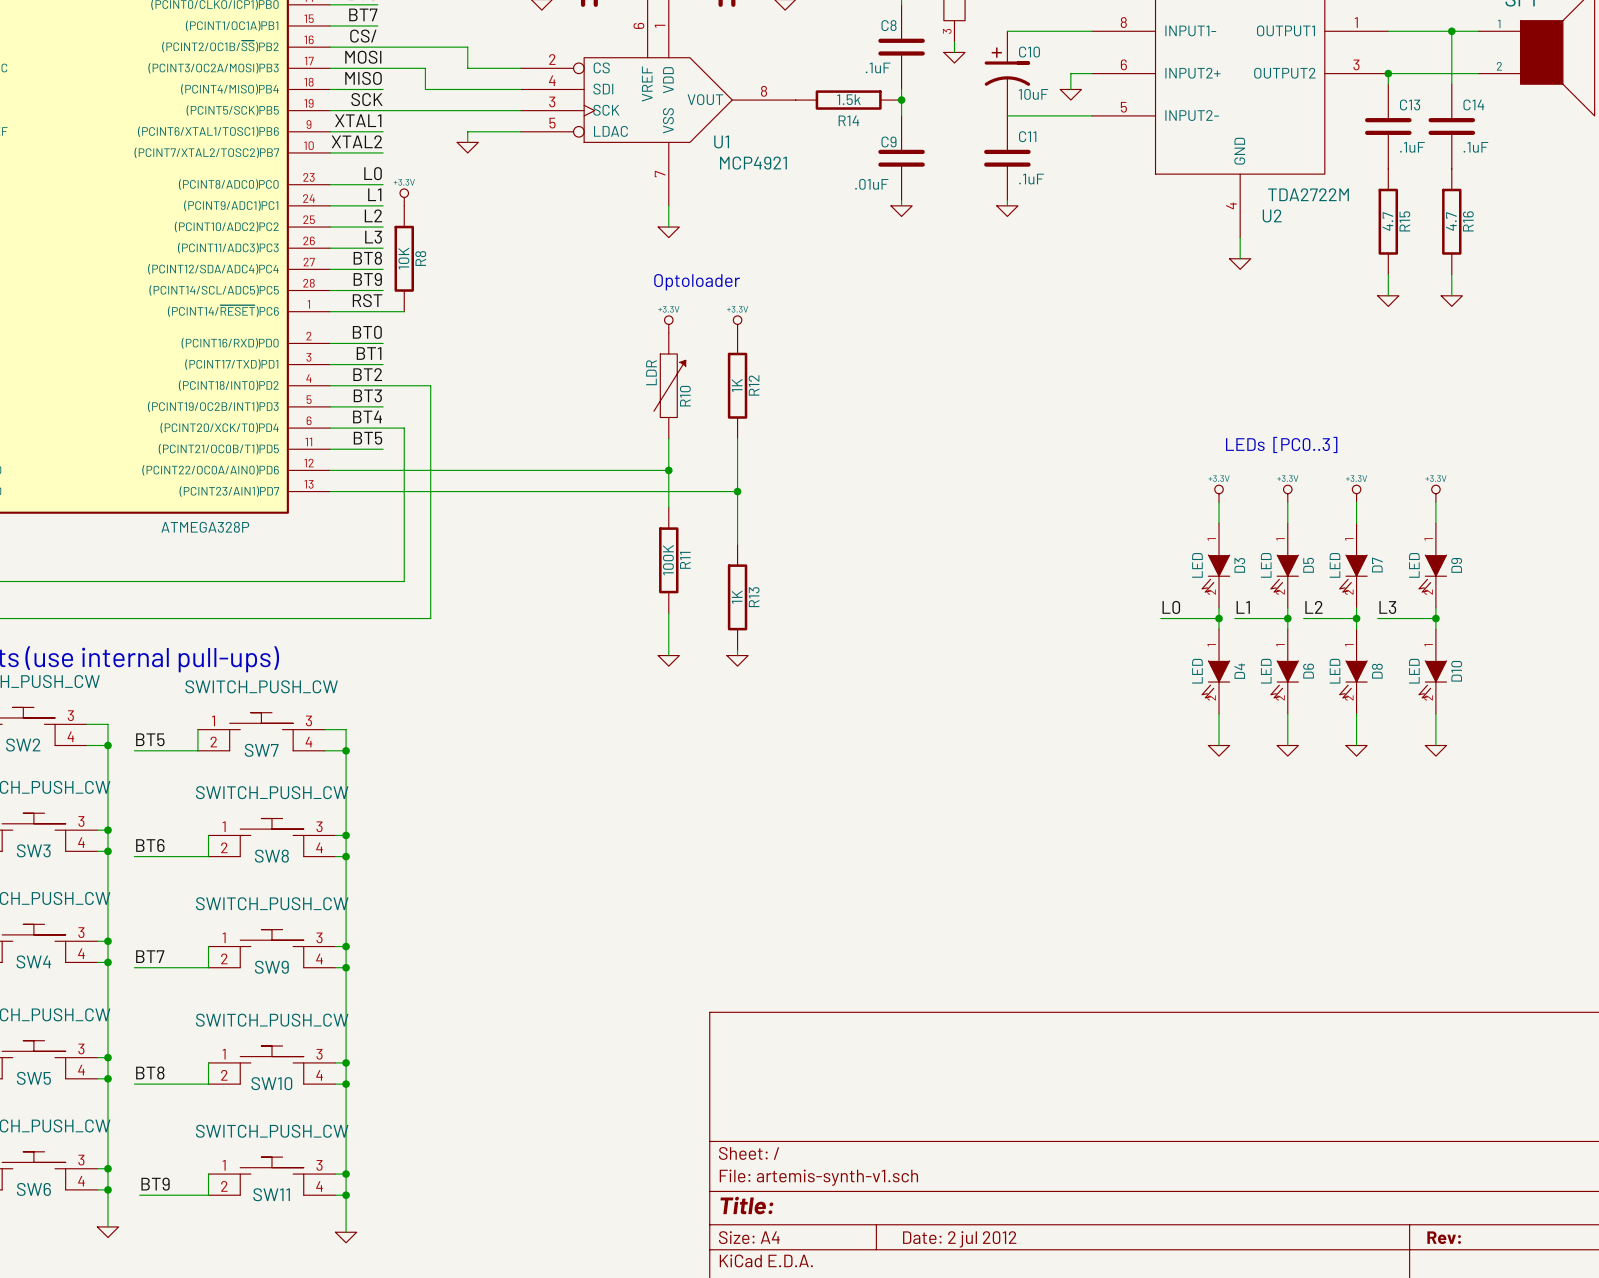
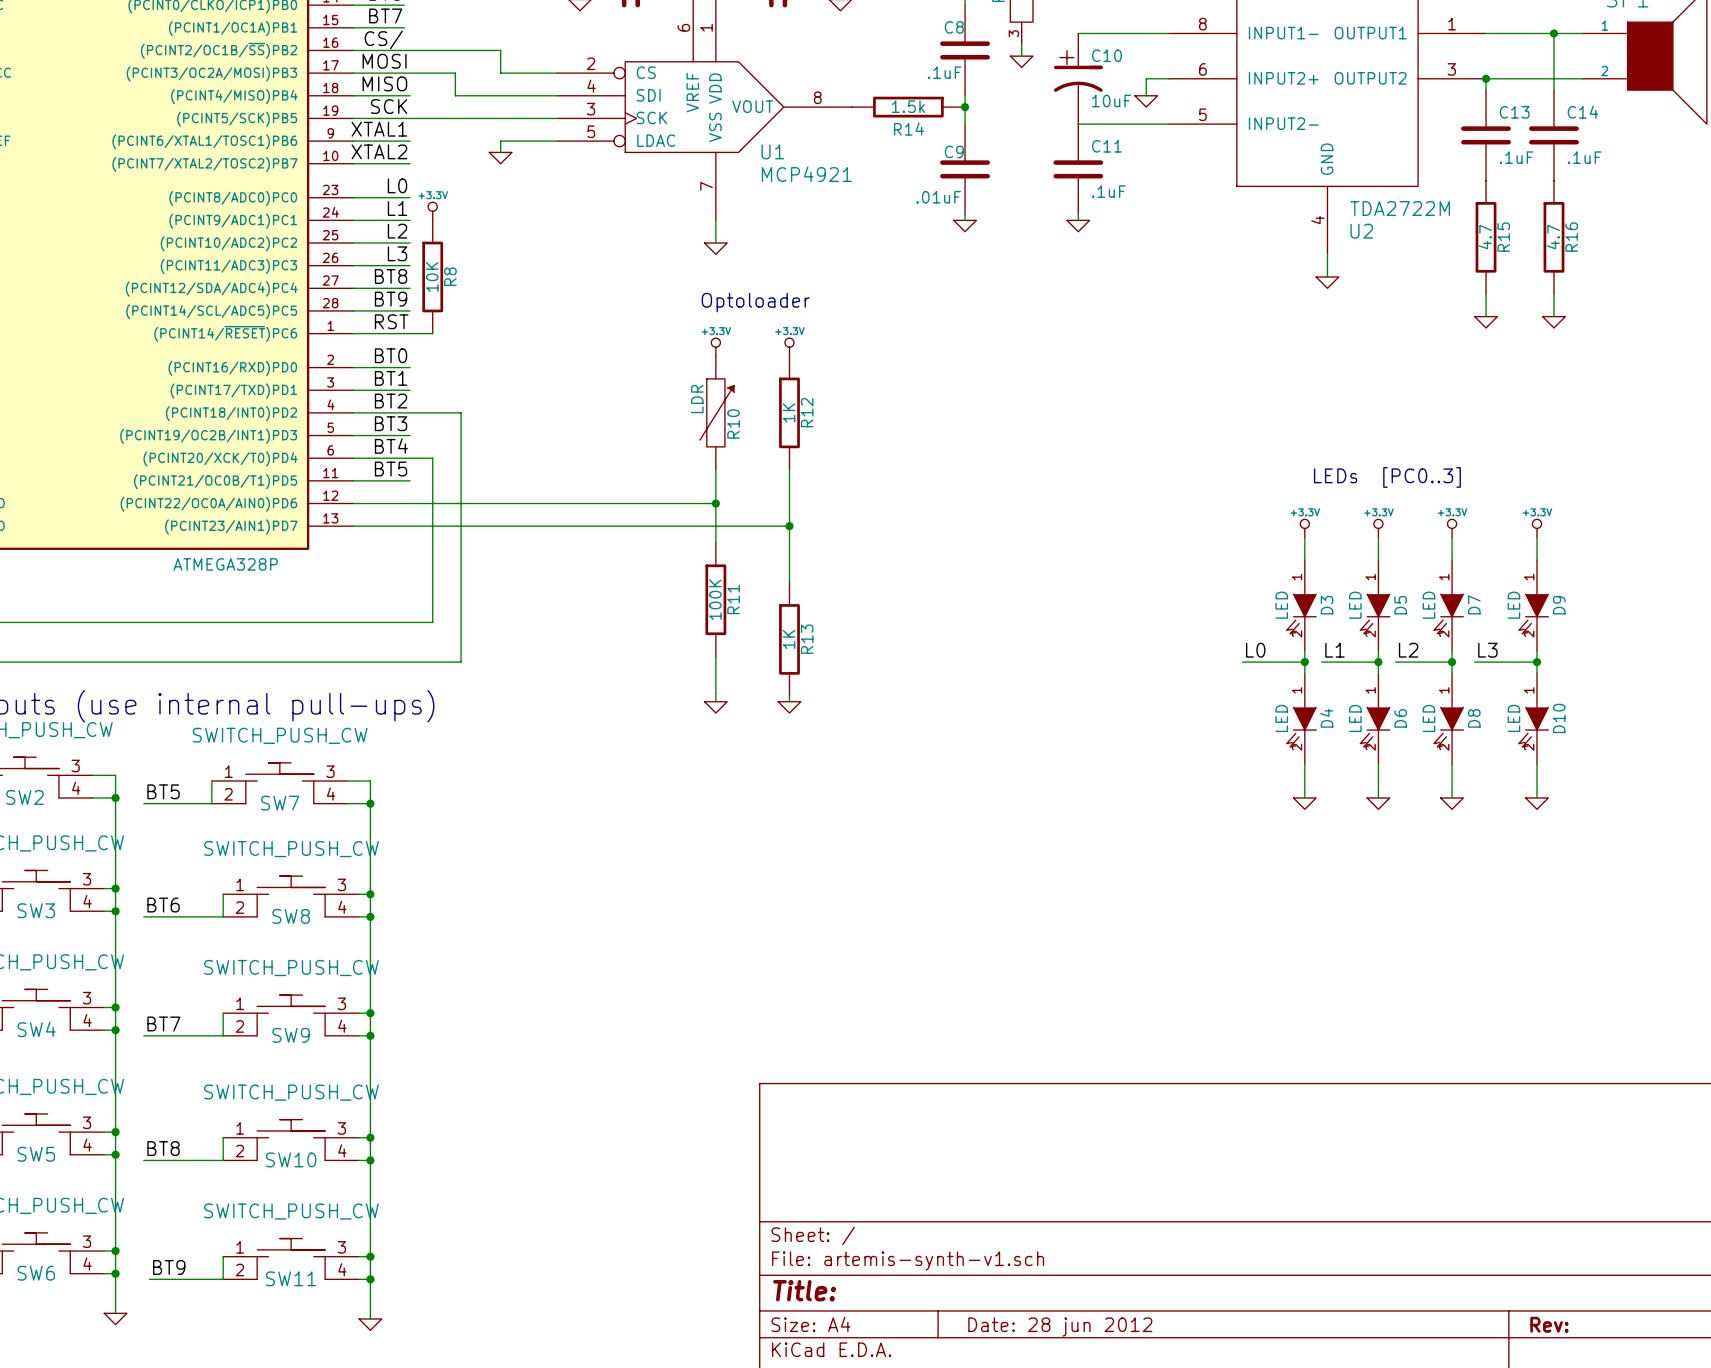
title block: Date: 2 jul 2012 (959, 1239) -> Date: 28 jun 2012 (1060, 1326)

